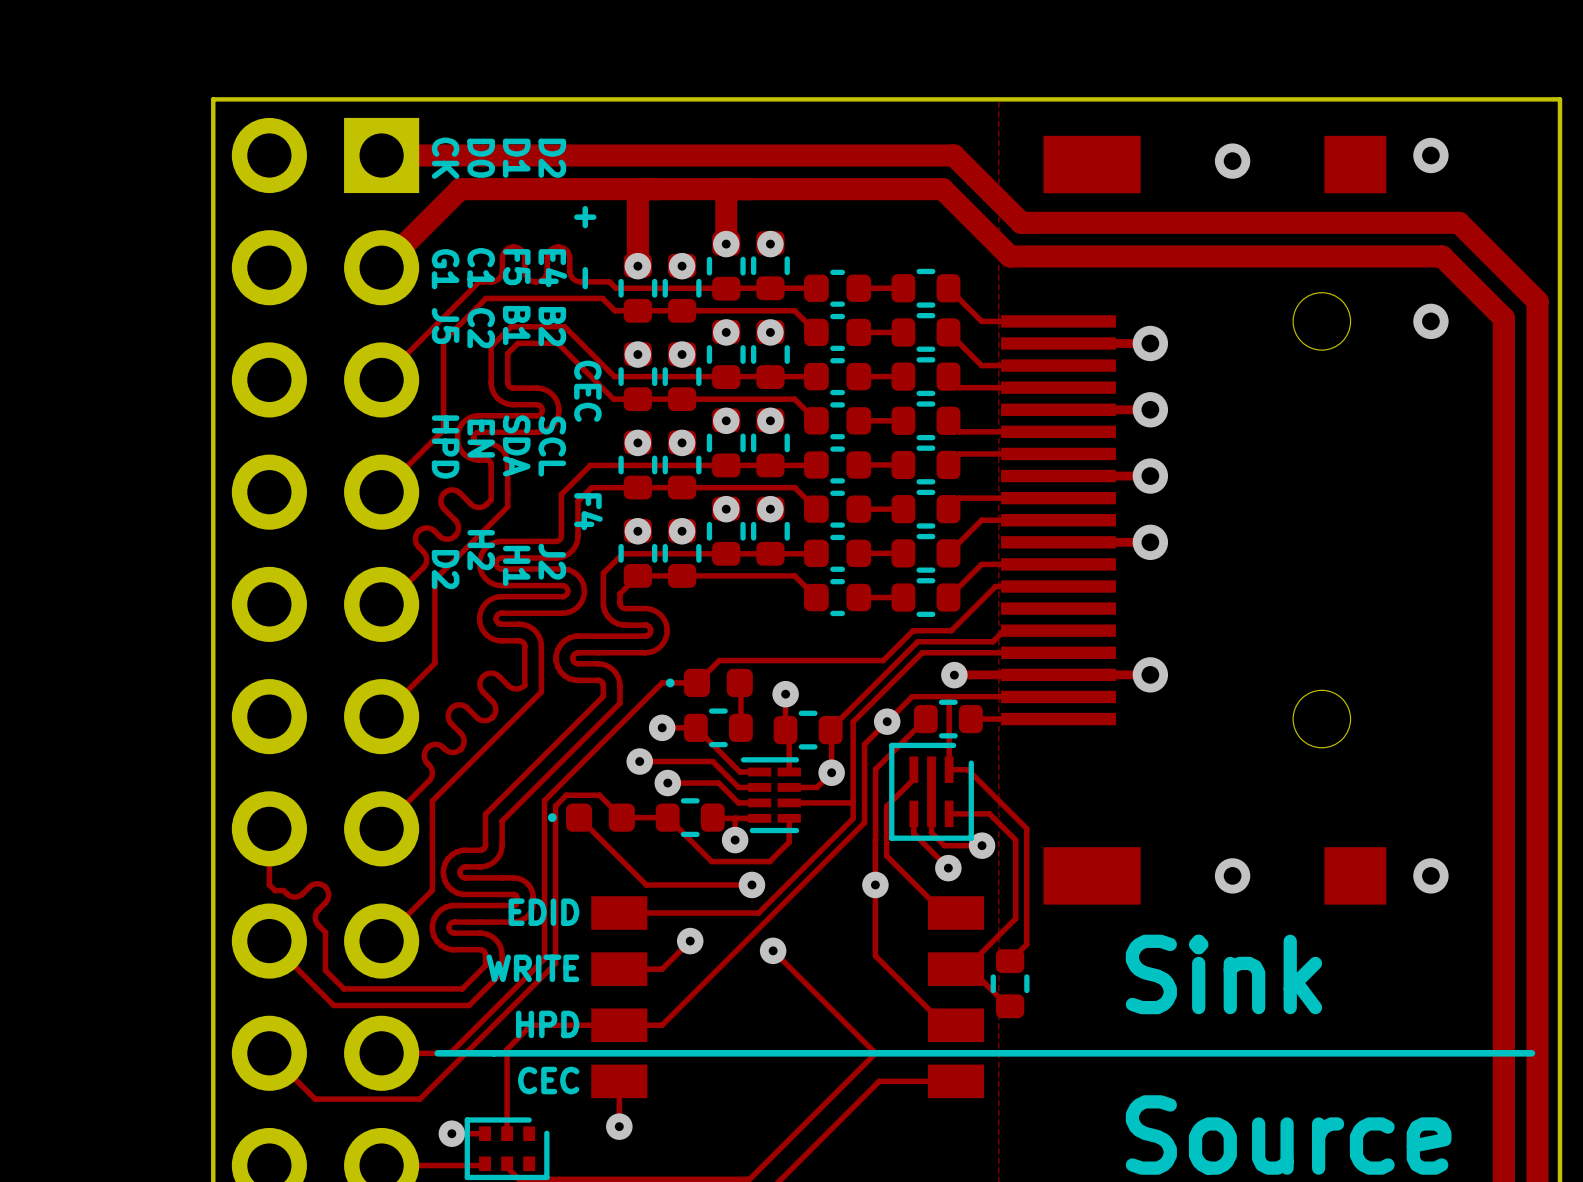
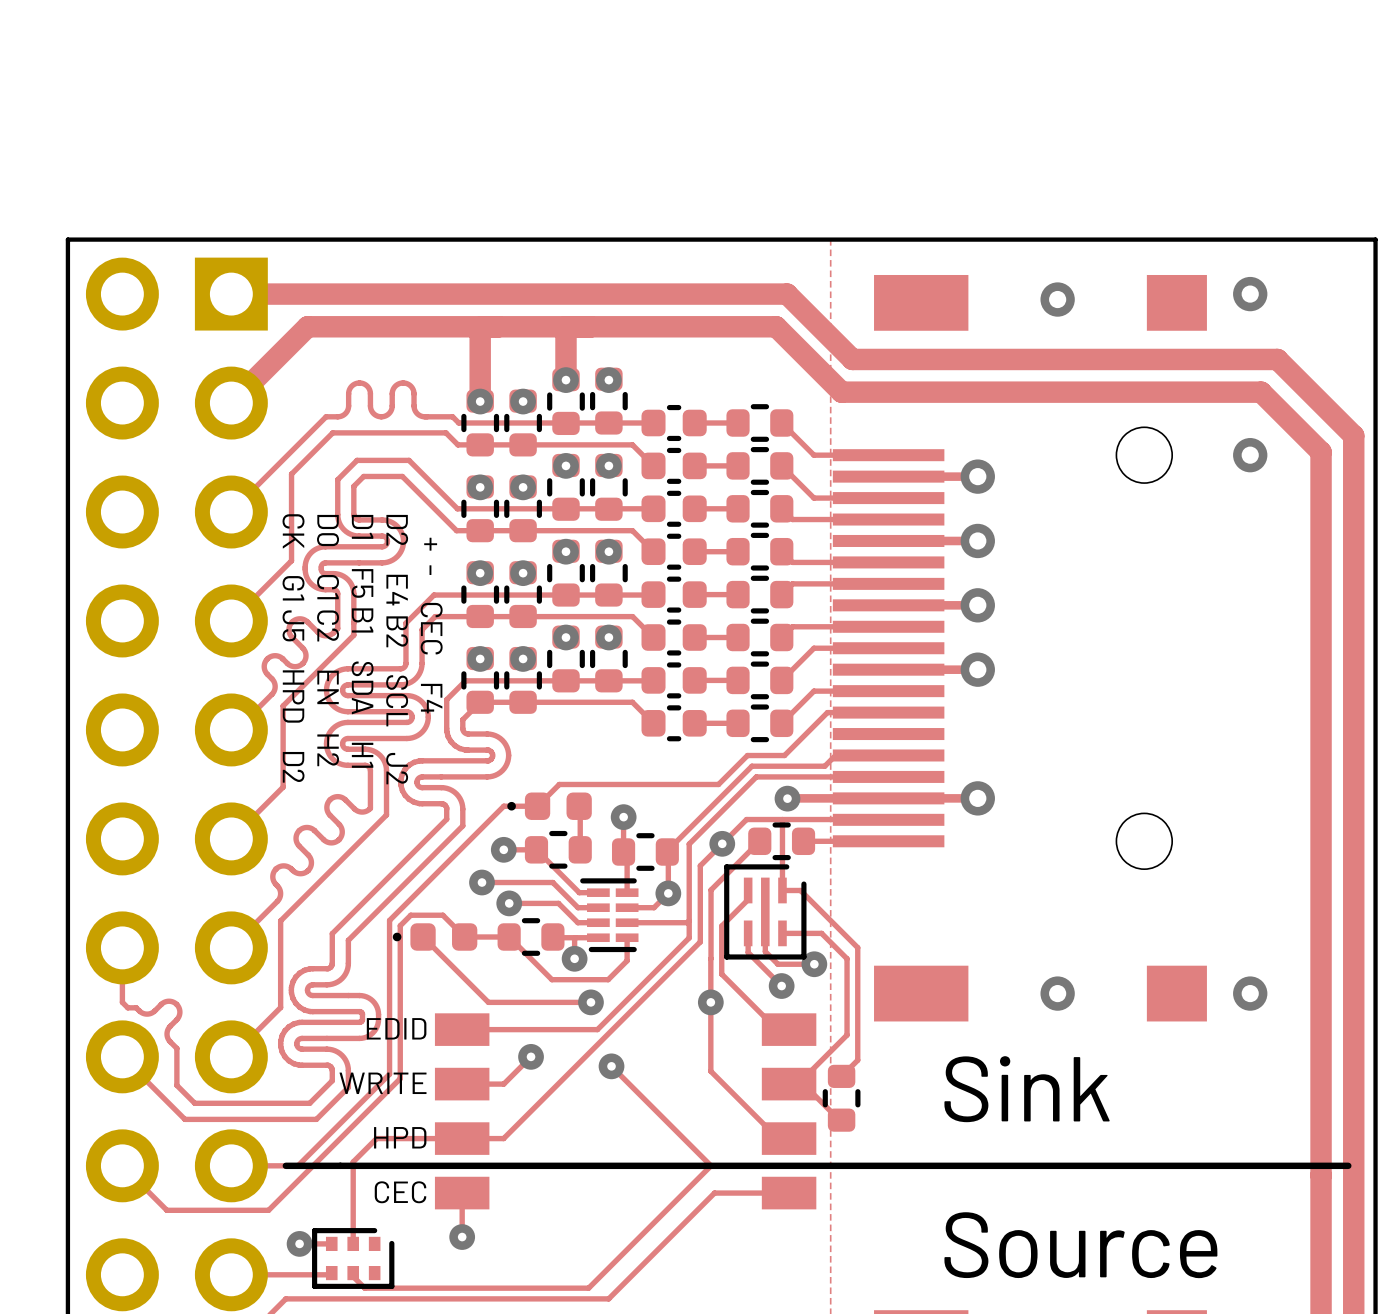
text position: D0 C1 C2 EN H2 (481, 354) -> D0 C1 C2 EN H2 (328, 640)
text position: D2 E4 B2 SCL J2 (552, 359) -> D2 E4 B2 SCL J2 (397, 649)
text position: D1 F5 B1 SDA H1 (516, 362) -> D1 F5 B1 SDA H1 (362, 641)
text position: CK G1 J5 HPD D2 (445, 363) -> CK G1 J5 HPD D2 (293, 648)
text position: + - CEC F4 (588, 368) -> + - CEC F4 (431, 625)

